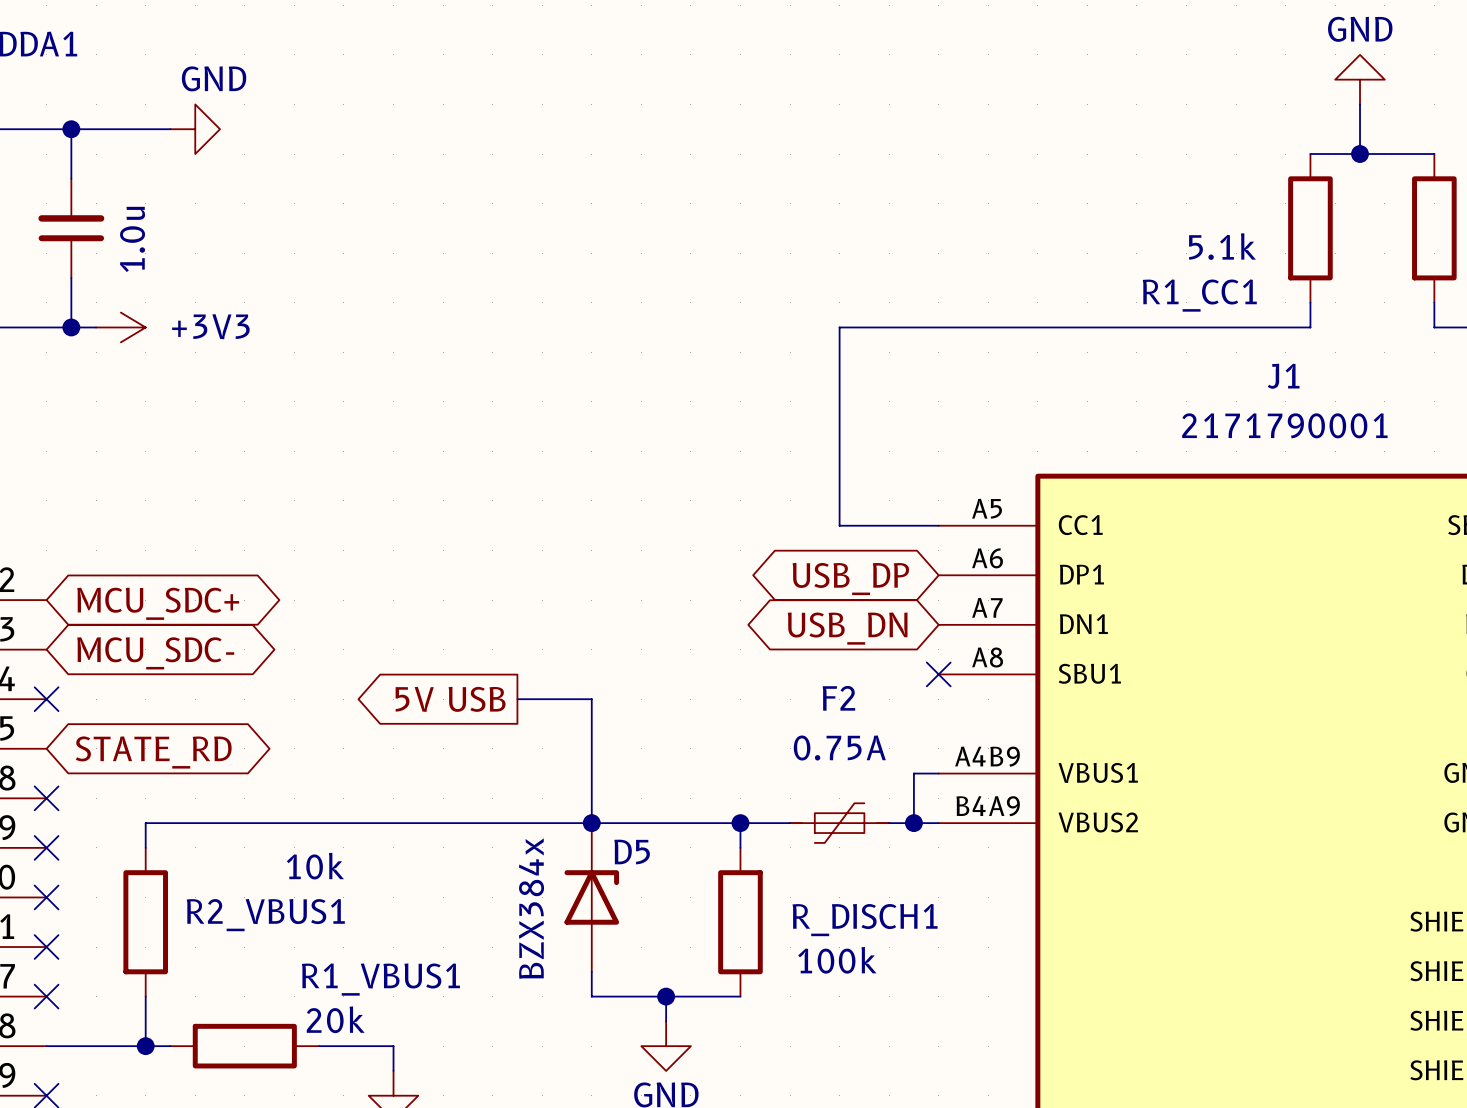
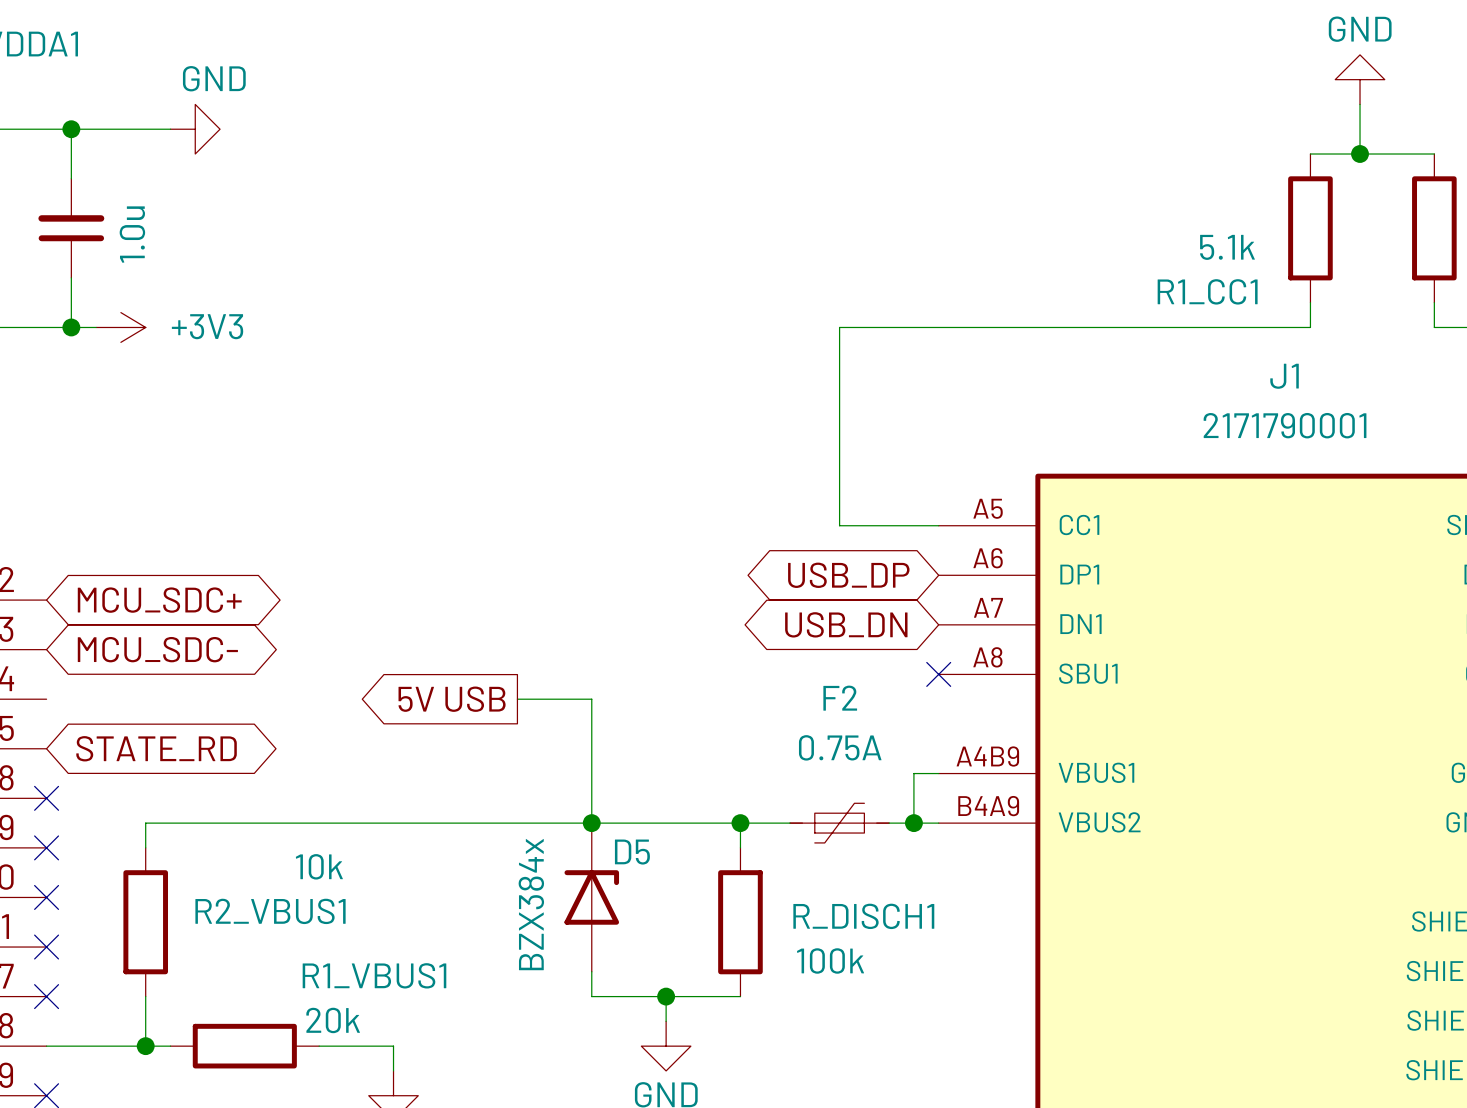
no-connect mark: (46, 699) -> none

